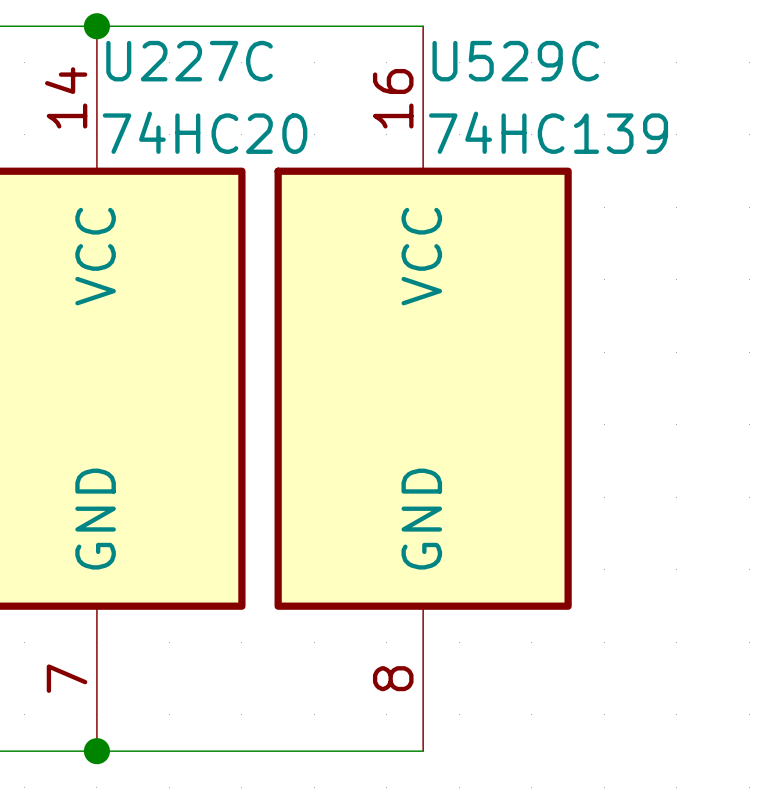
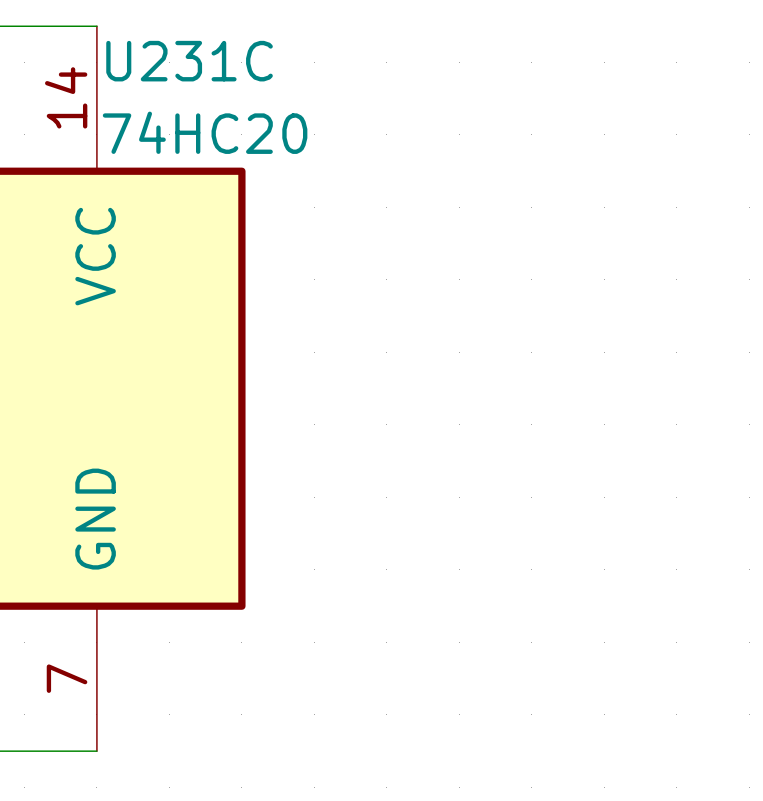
wire: (96, 26) (423, 26) -> none
junction: (96, 26) -> none
U227C name: U227C (189, 61) -> U231C (189, 61)
U529C: 74HC139 (423, 388) -> none
wire: (96, 751) (423, 751) -> none
junction: (96, 751) -> none

